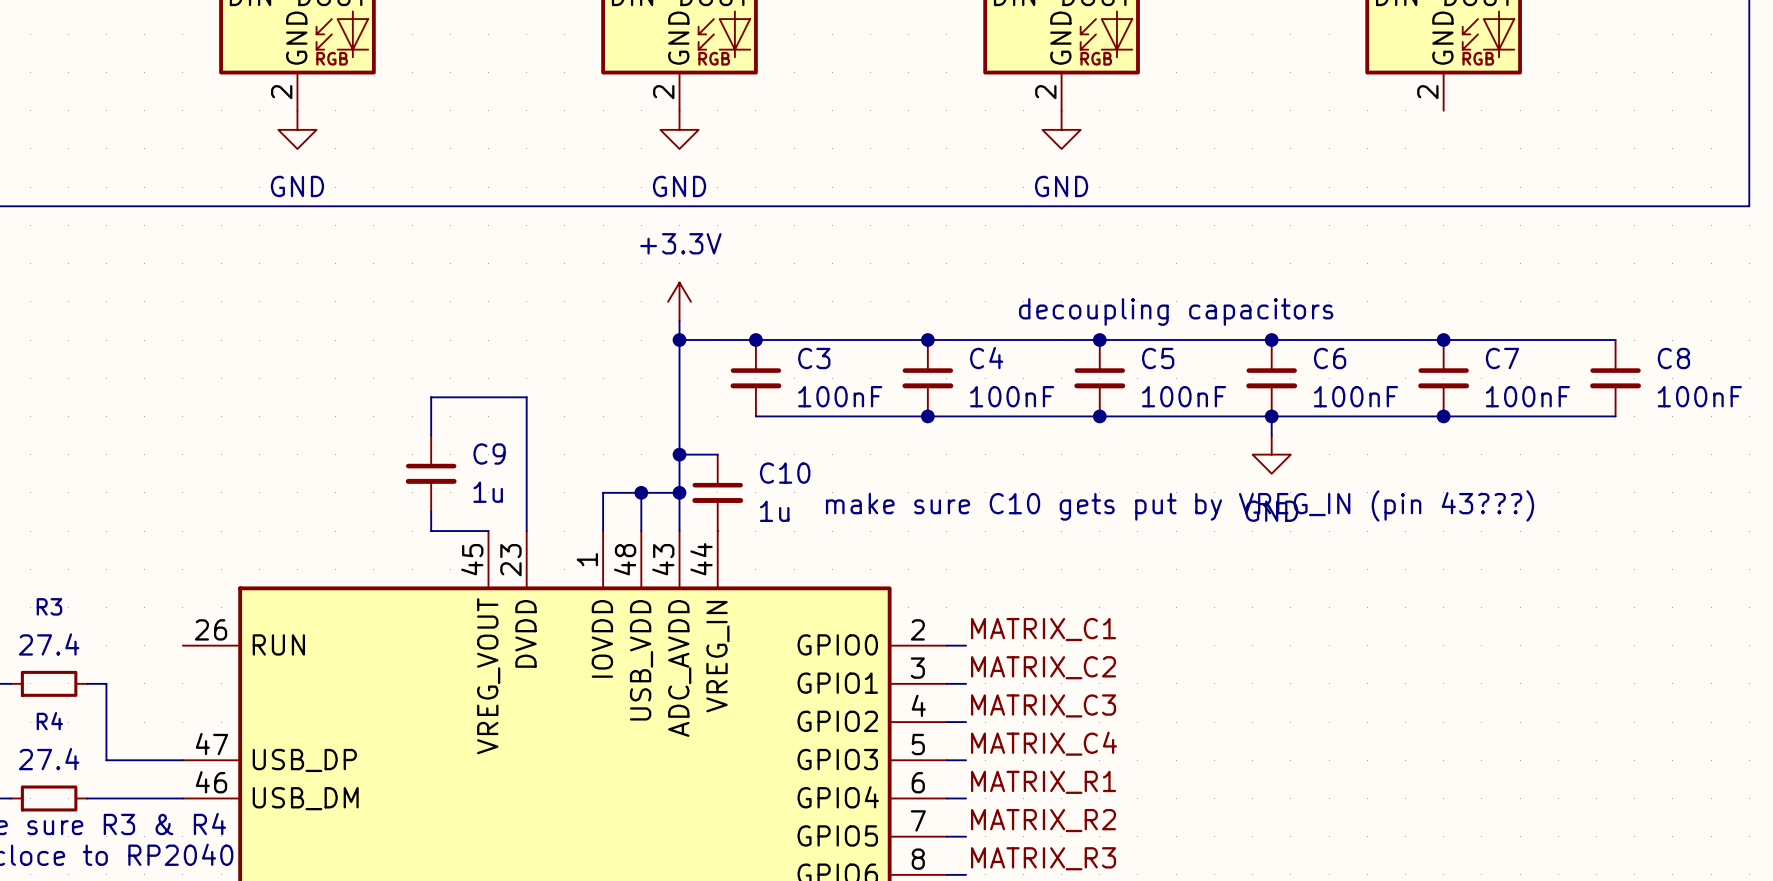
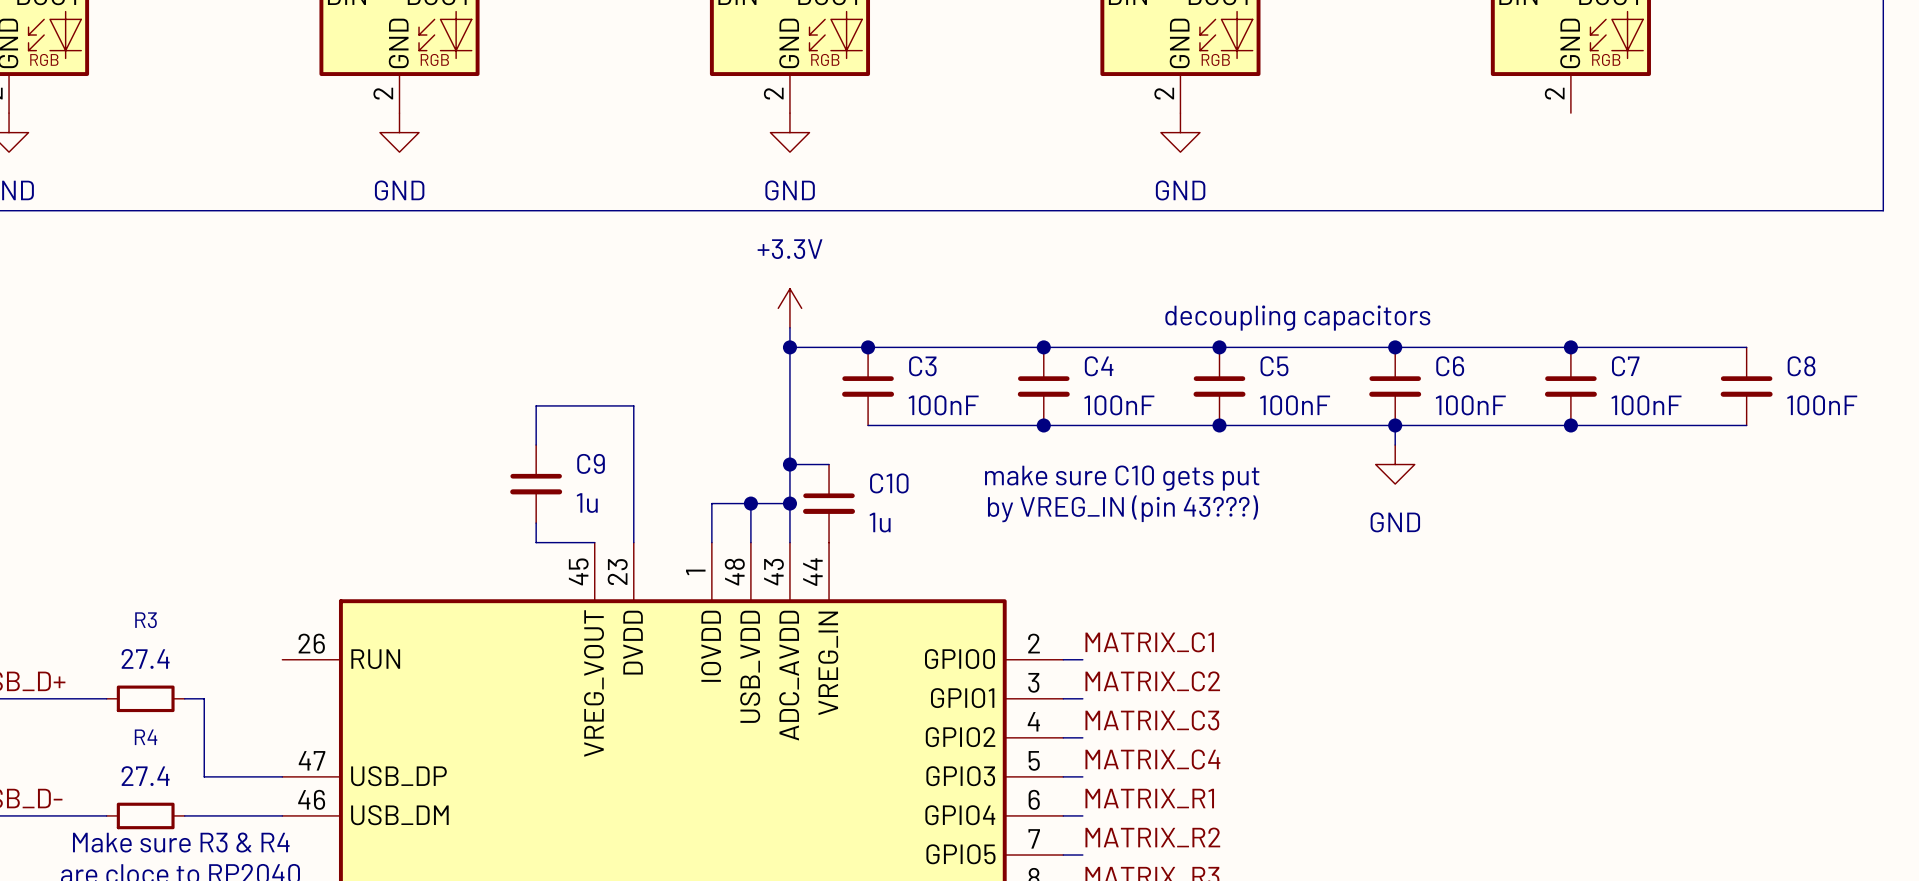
text: none -> make sure C10 gets put (1122, 478)
text: none -> by VREG_IN (pin 43???) (1123, 508)
text: make sure C10 gets put by VREG_IN (pin 43???) (1180, 505) -> none

